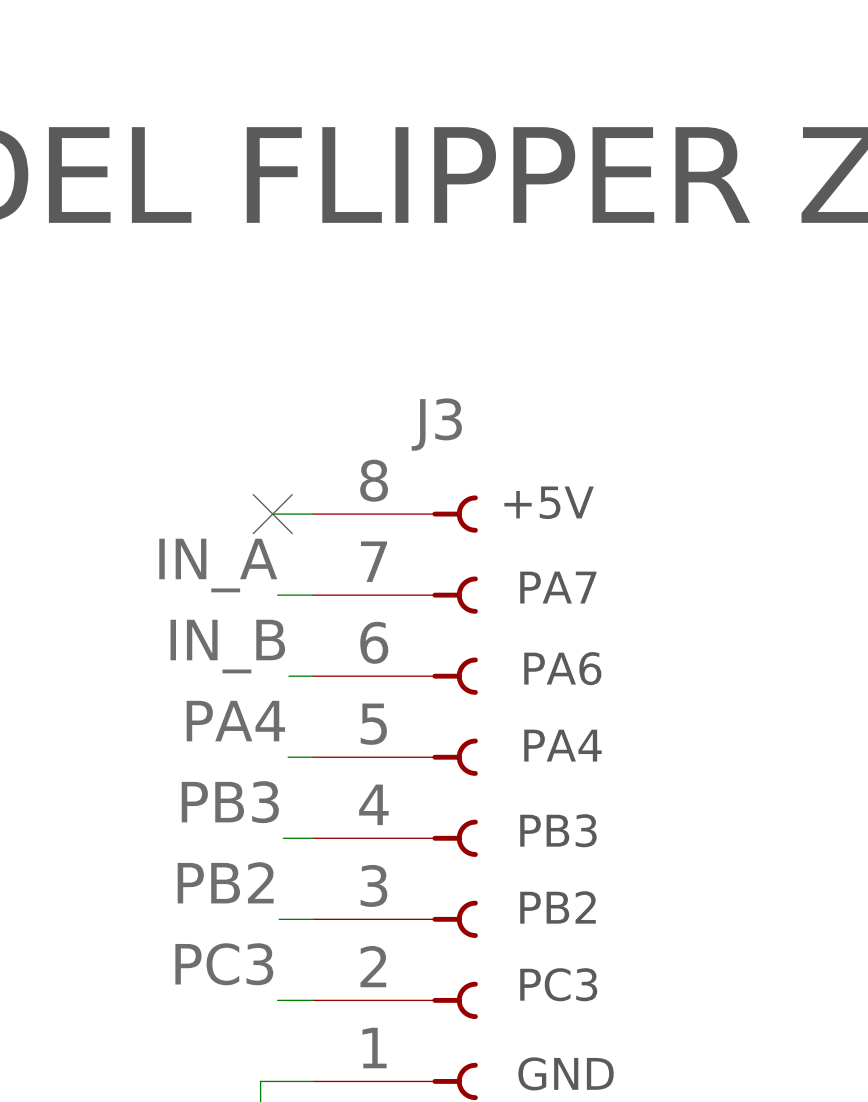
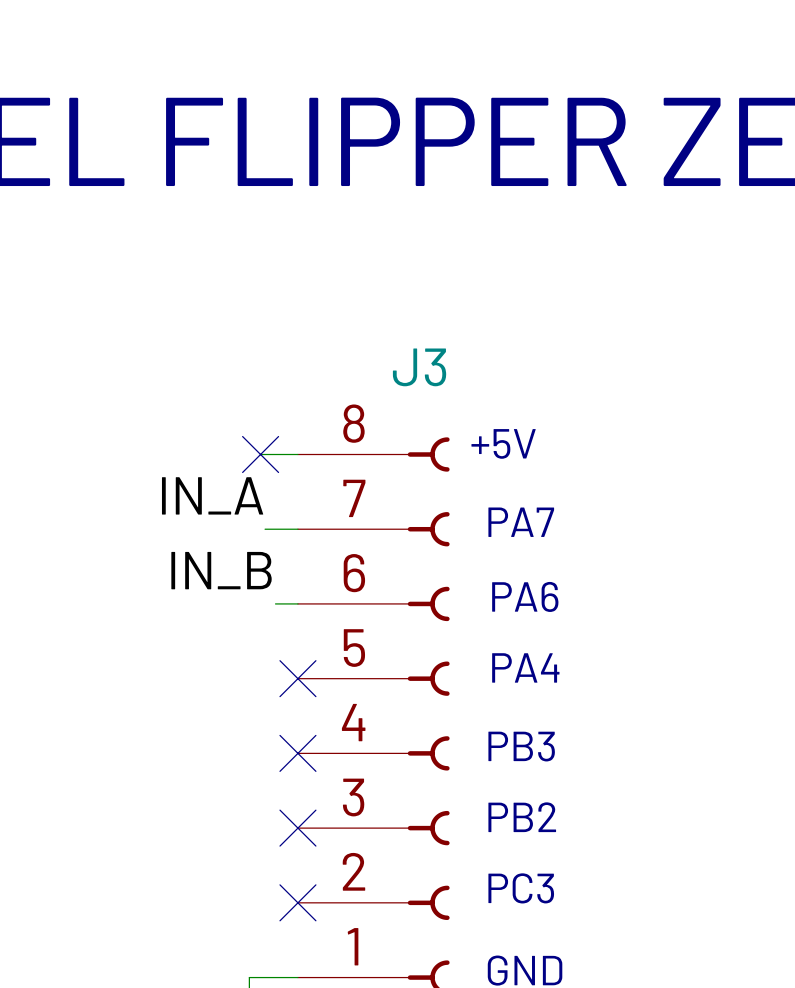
label: PA4 (235, 721) -> none
wire: (288, 757) (313, 757) -> none
no-connect mark: none -> (297, 678)
label: PB3 (230, 802) -> none
wire: (283, 838) (313, 838) -> none
no-connect mark: none -> (297, 753)
label: PB2 (225, 882) -> none
wire: (279, 919) (313, 919) -> none
no-connect mark: none -> (297, 828)
label: PC3 (224, 964) -> none
wire: (277, 1000) (313, 1000) -> none
no-connect mark: none -> (297, 902)

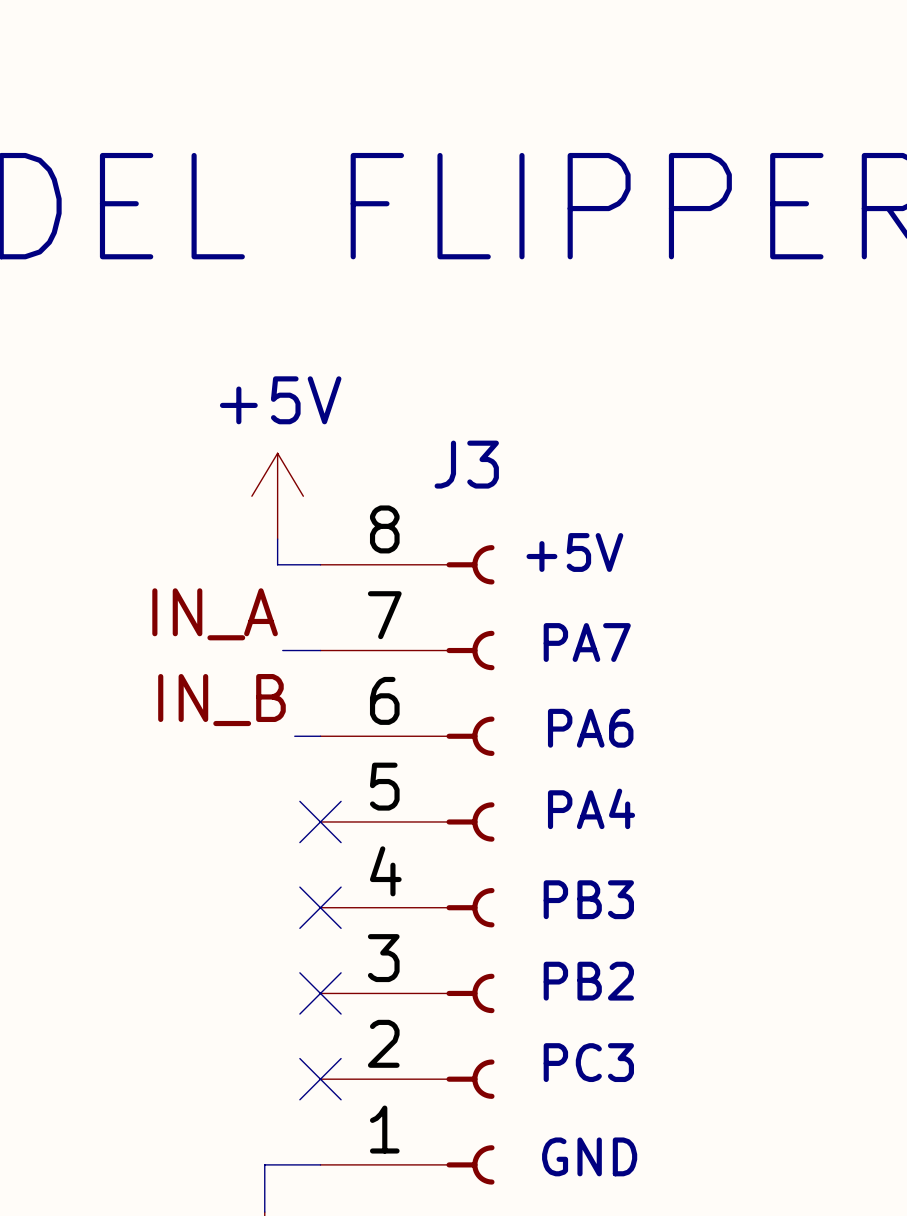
power symbol: none -> +5V (277, 496)
wire: none -> (277, 539) (277, 564)
no-connect mark: (260, 454) -> none

